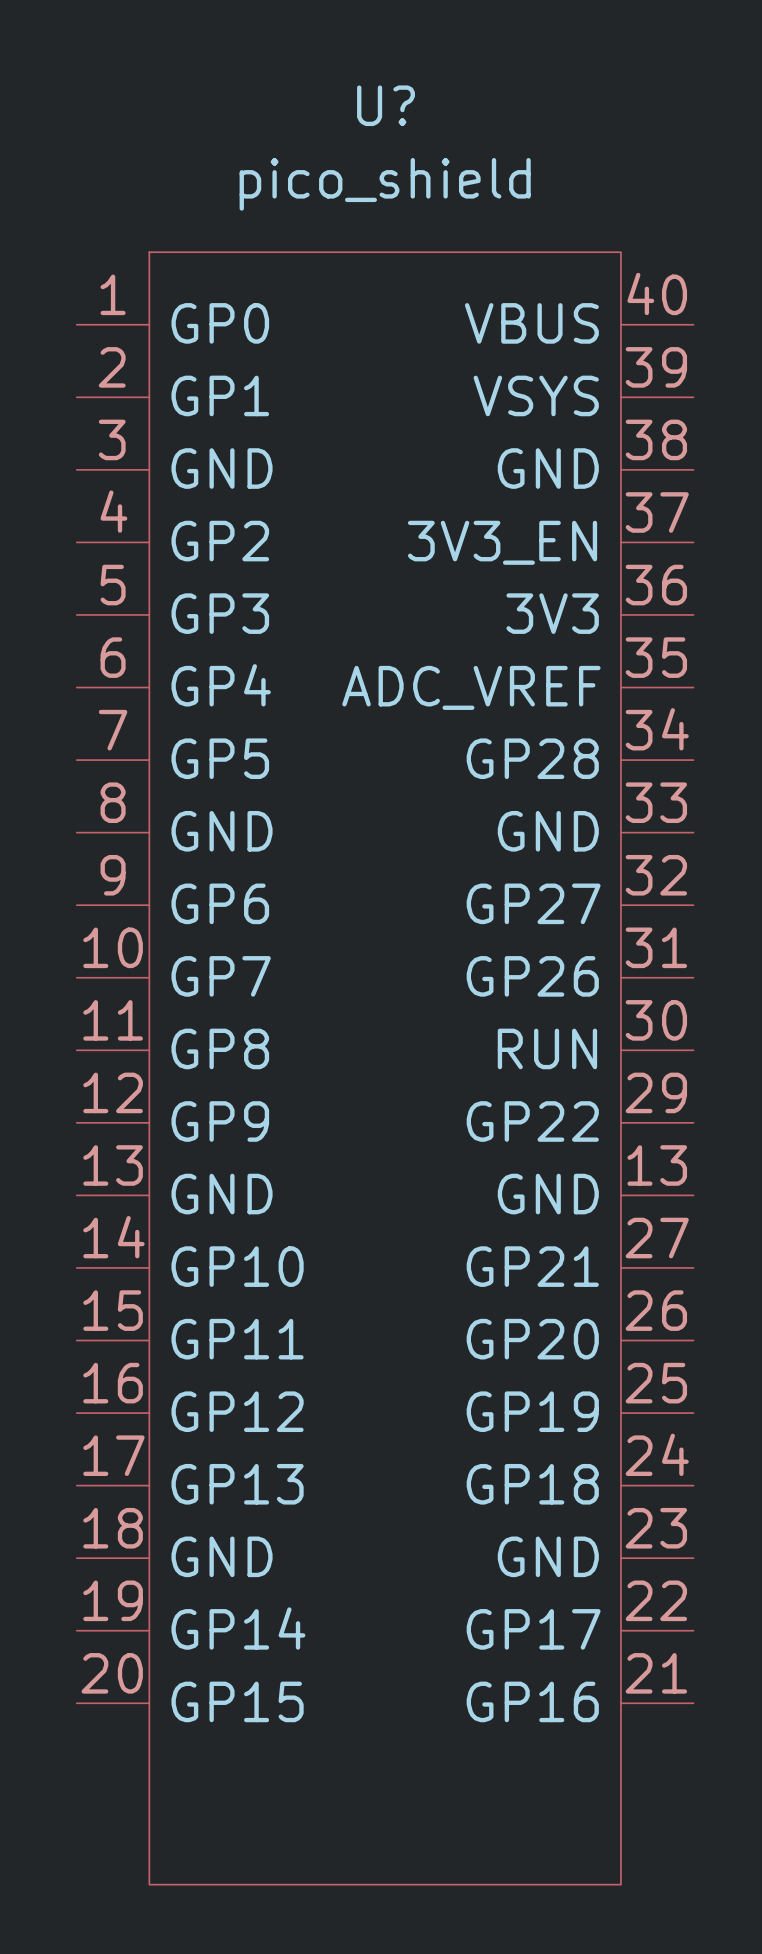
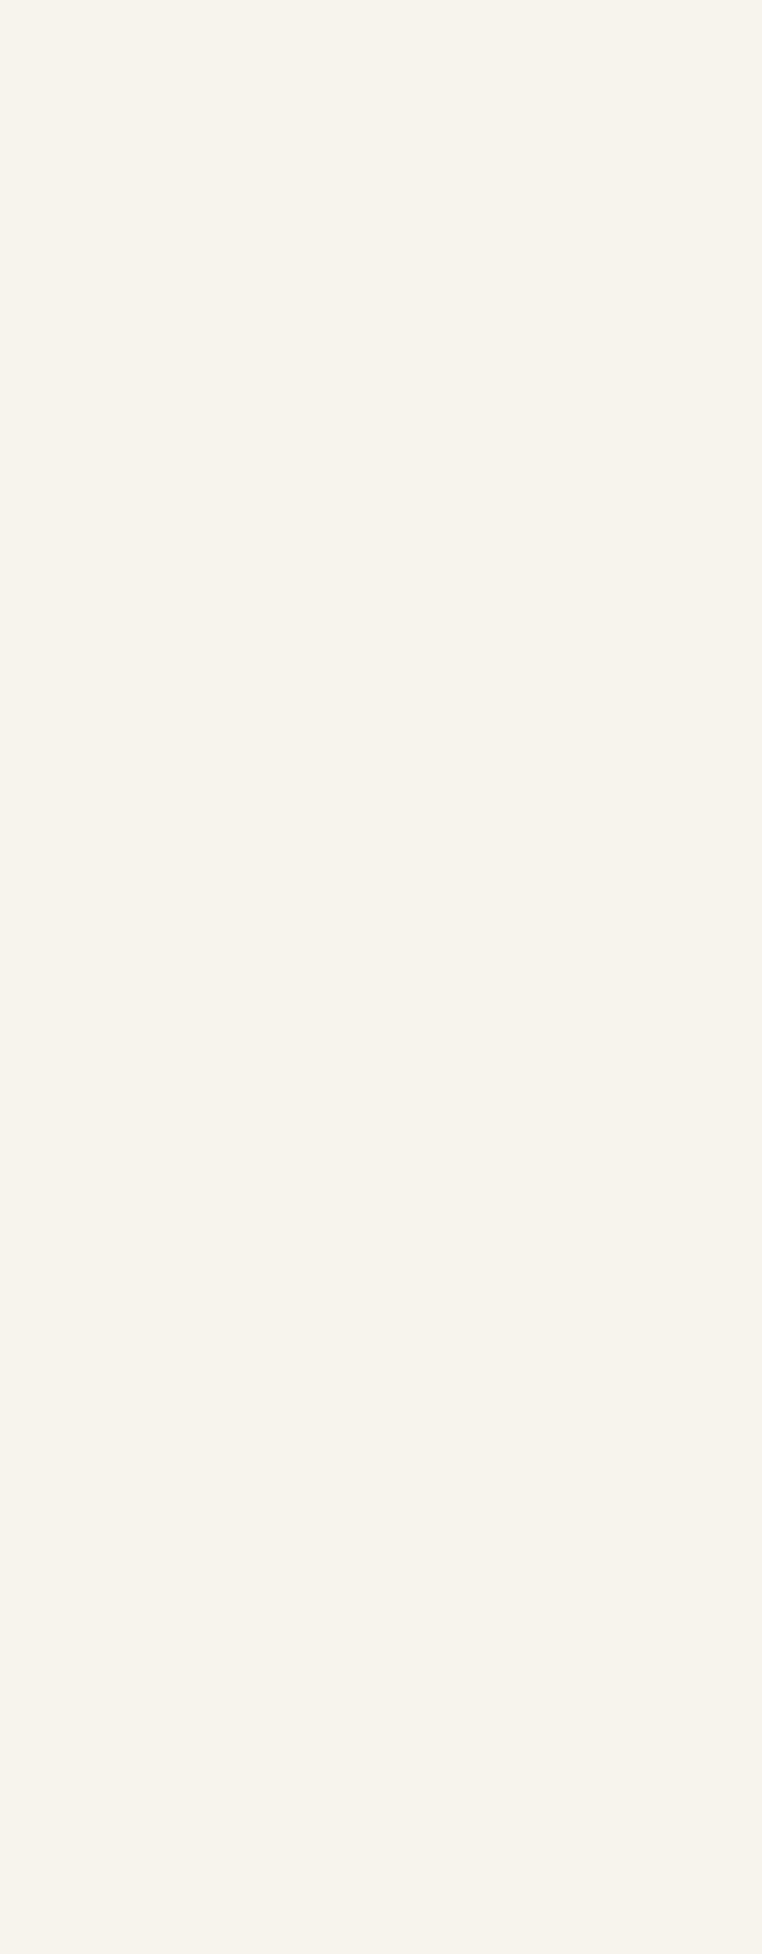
U?: pico_shield (385, 1068) -> none

